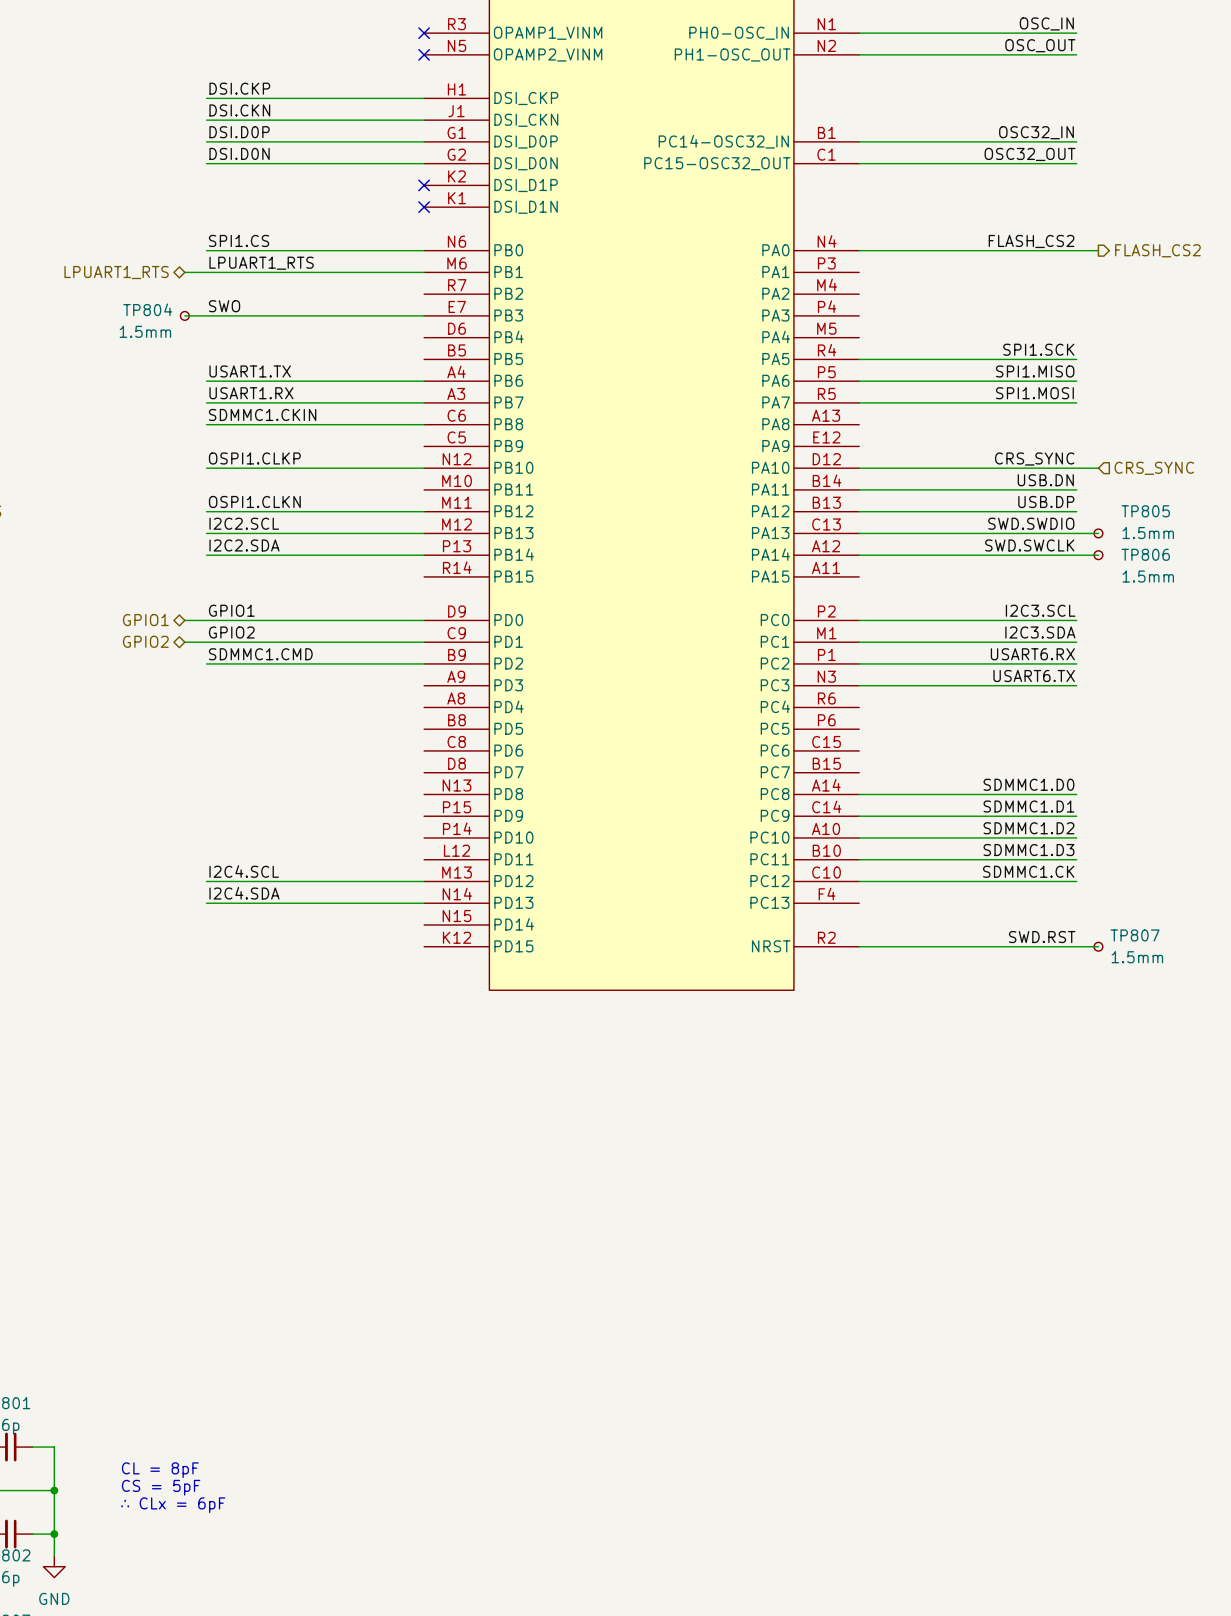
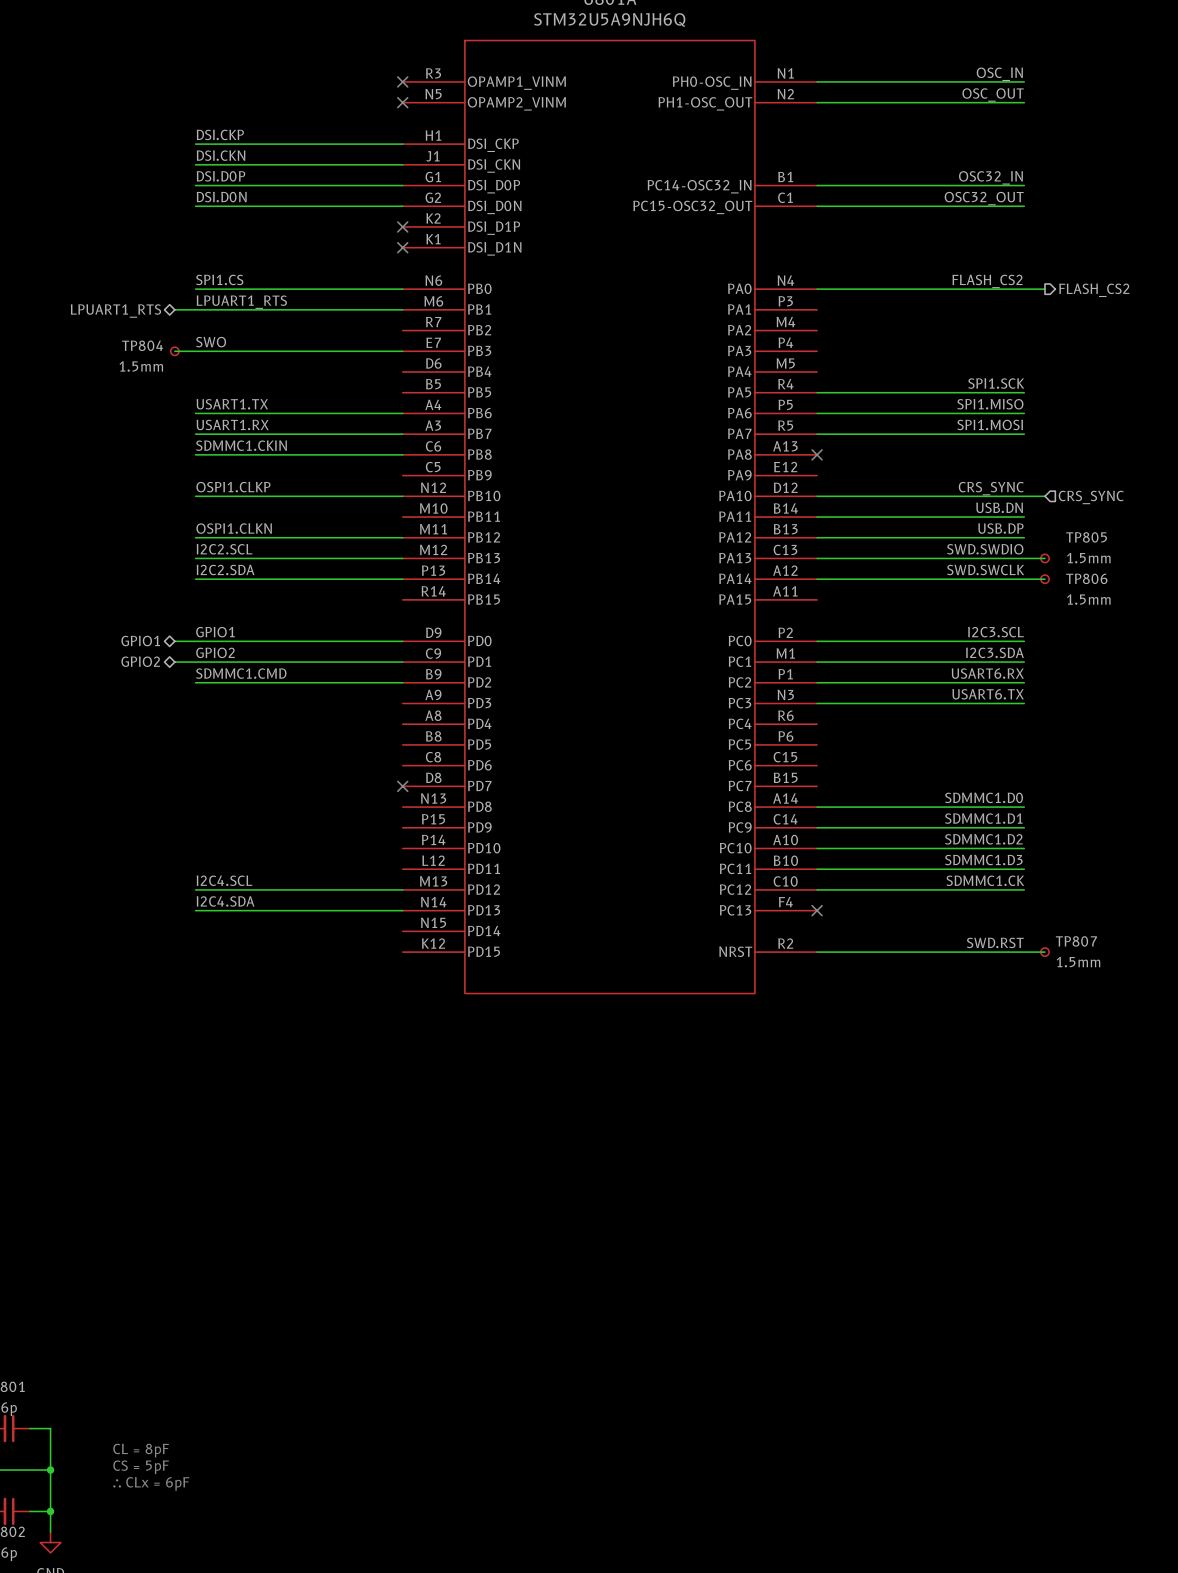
no-connect mark: none -> (817, 454)
no-connect mark: none -> (402, 786)
no-connect mark: none -> (817, 910)

